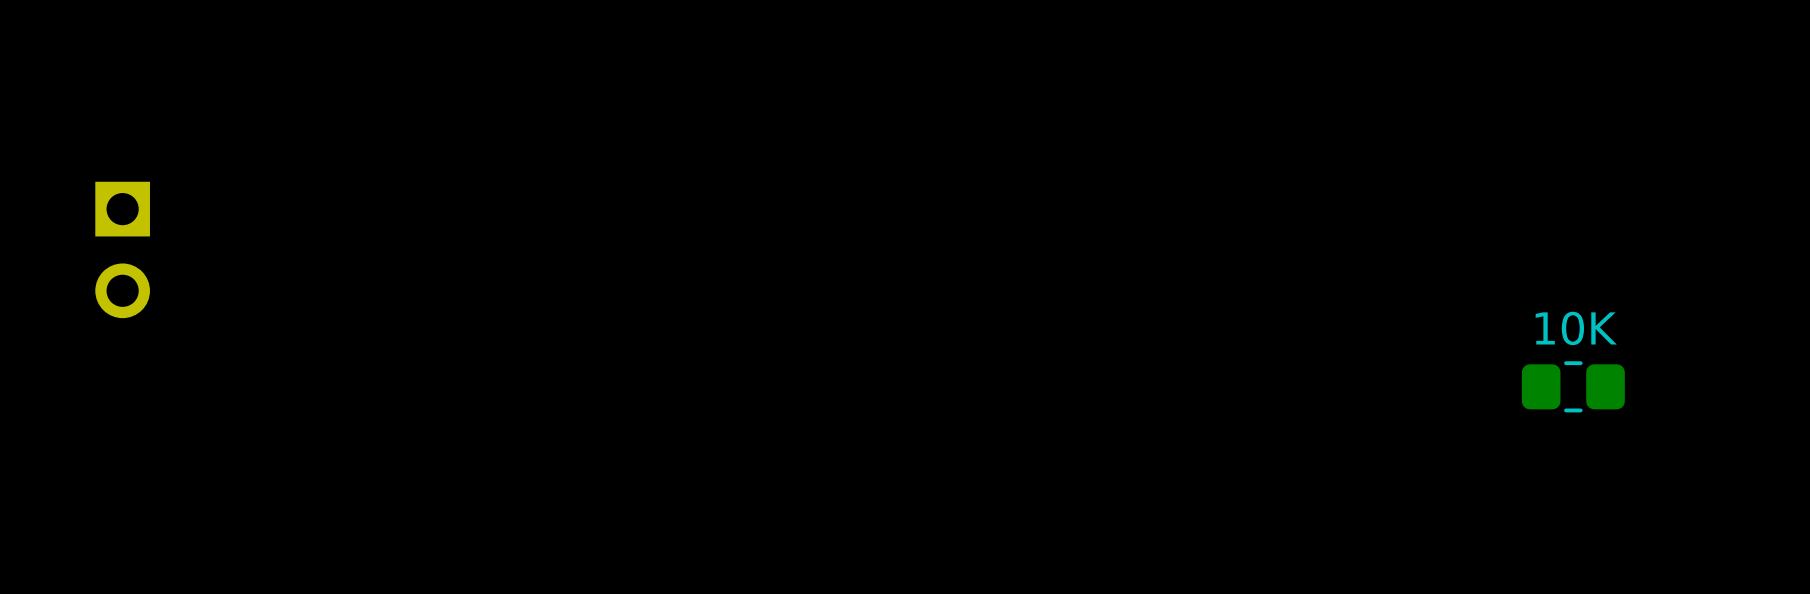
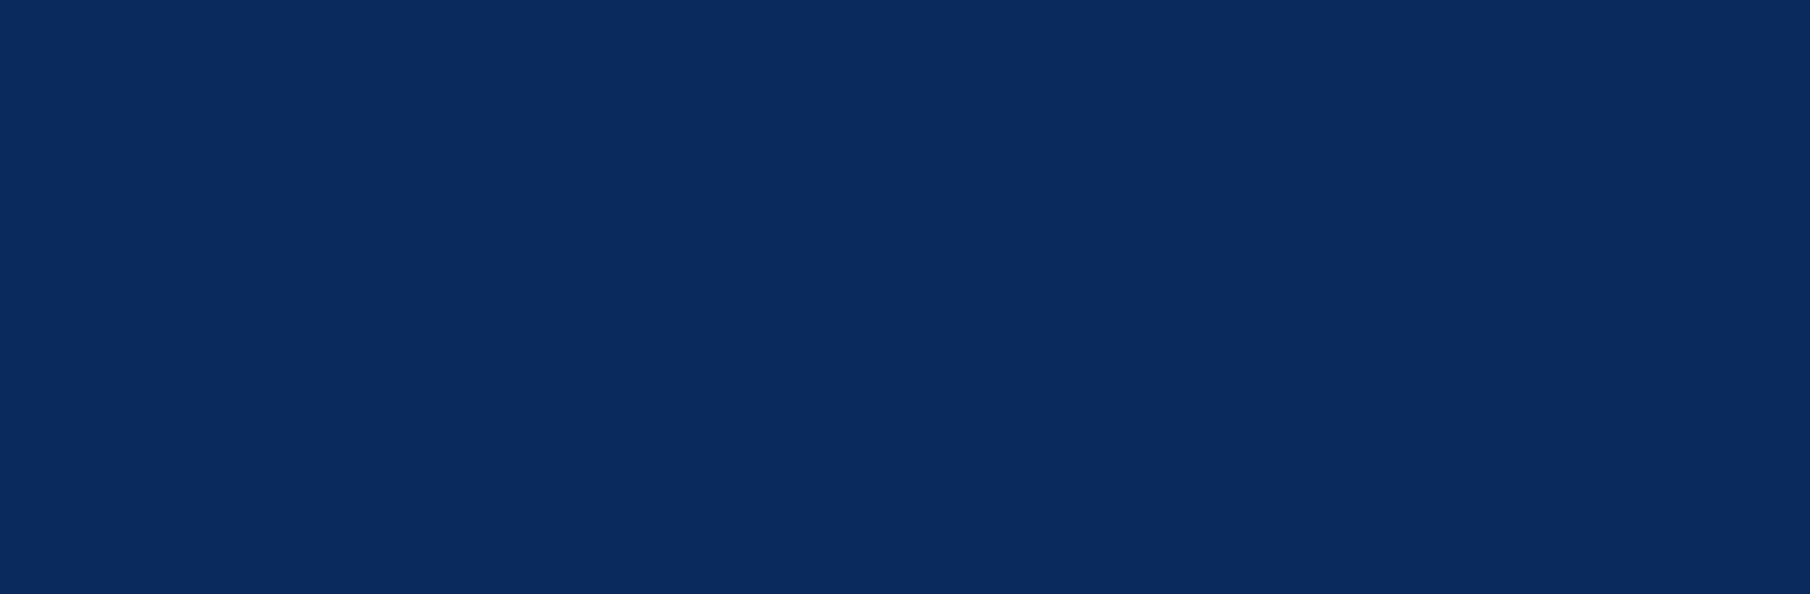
part: (122, 249) -> none
part: 10K (1573, 386) -> none

